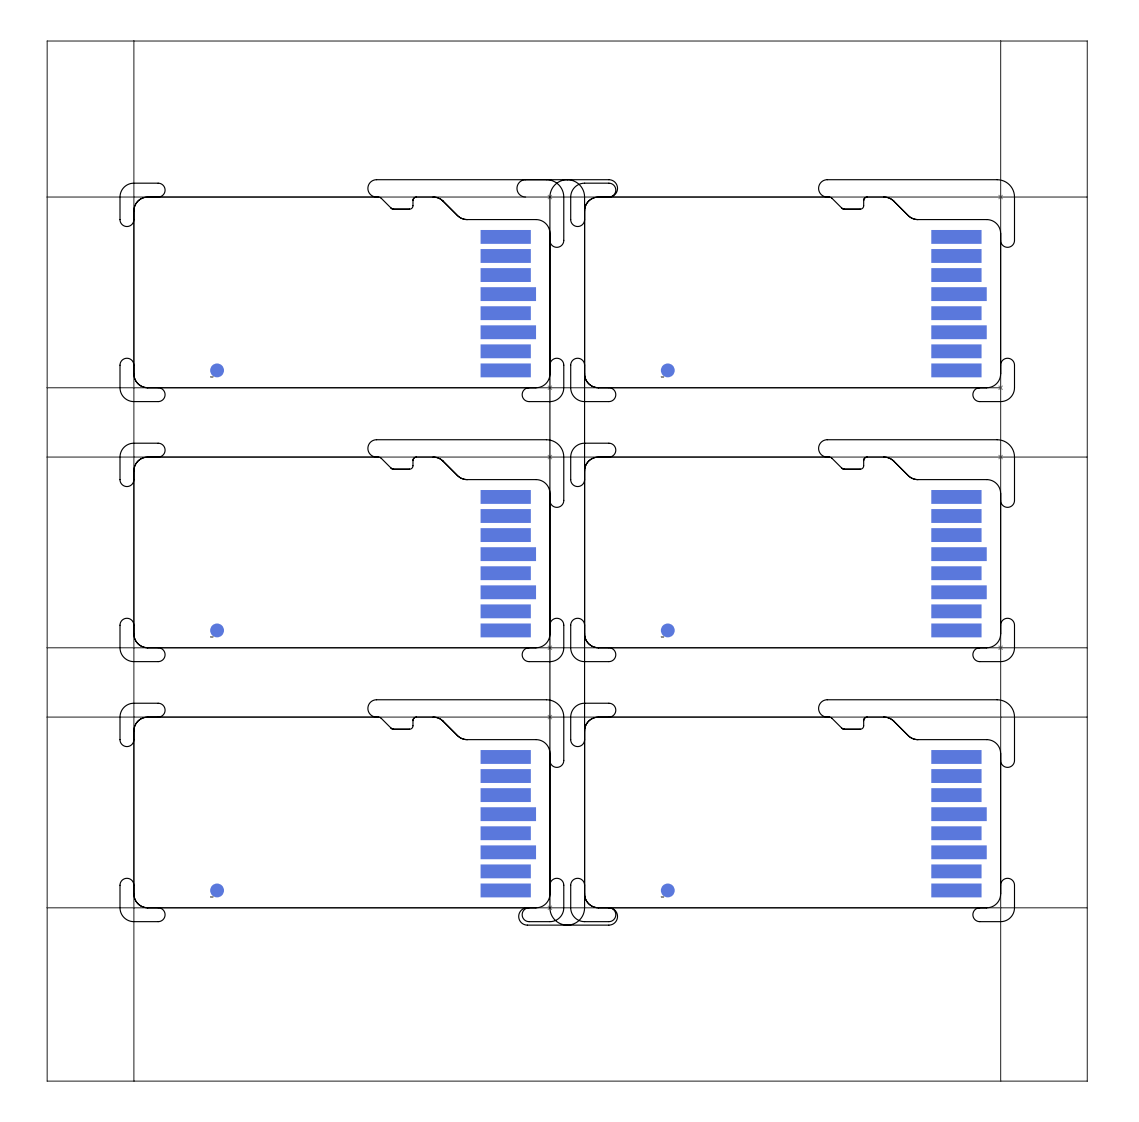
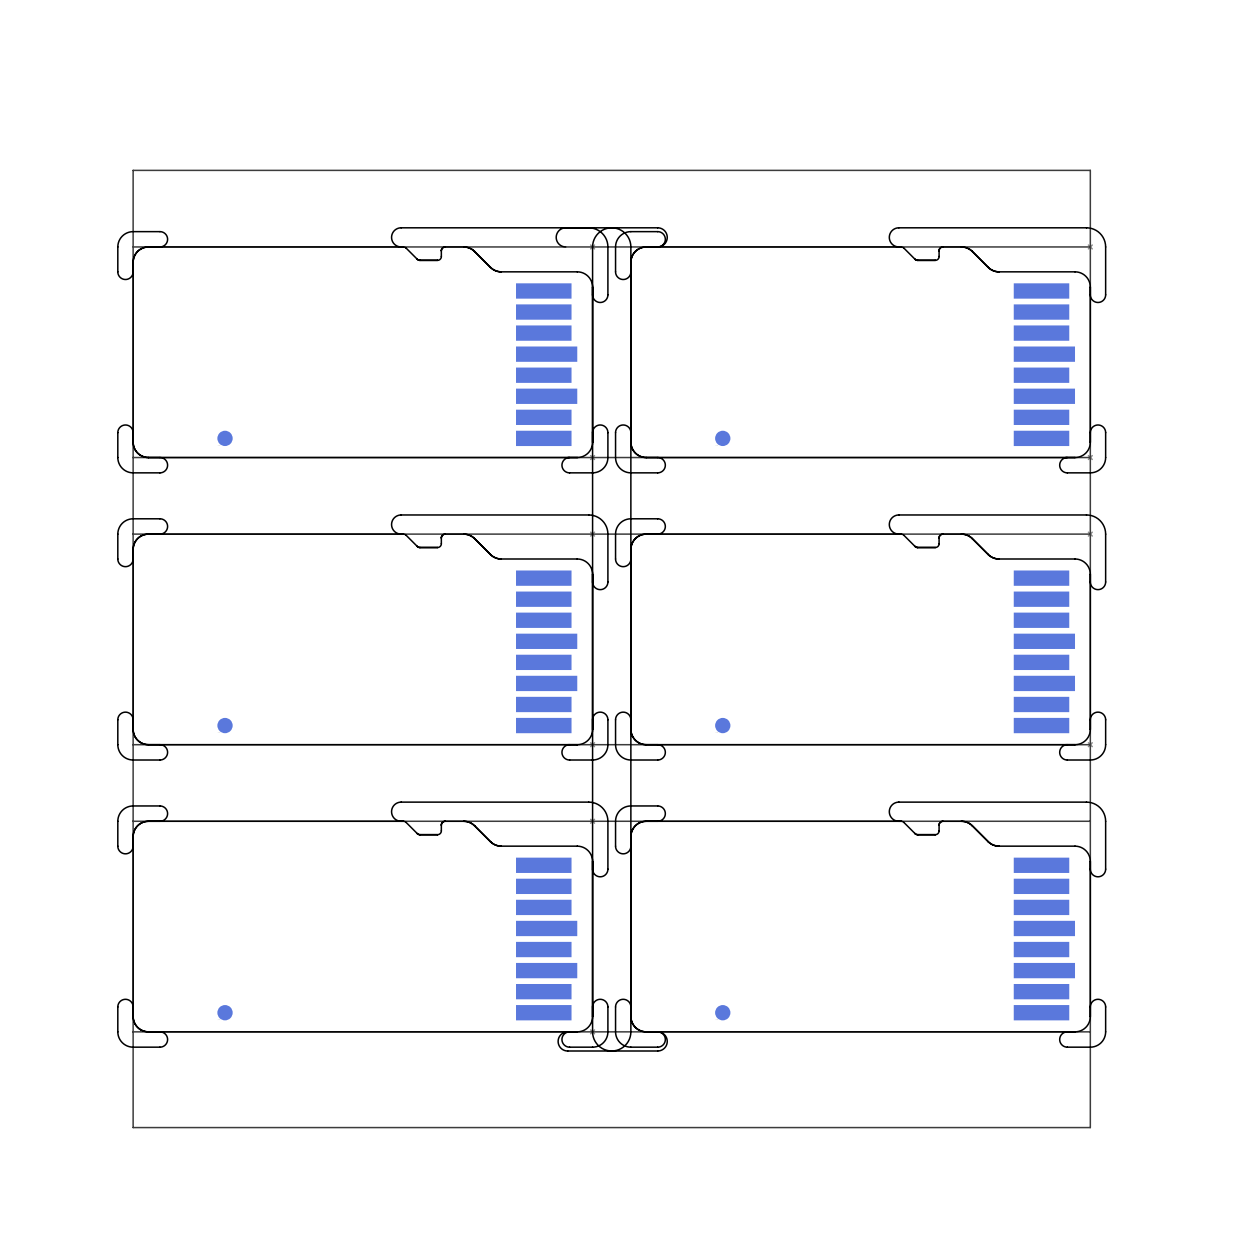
line: (133, 41) (133, 127) -> none
line: (1000, 41) (1000, 127) -> (133, 170) (1090, 170)
line: (1087, 41) (47, 41) (47, 1081) (1087, 1081) (1087, 41) -> none
line: (133, 197) (47, 197) -> none
line: (1087, 197) (1000, 197) -> none
line: (133, 387) (47, 387) -> none
line: (133, 457) (47, 457) -> none
line: (1087, 457) (1000, 457) -> none
line: (133, 647) (47, 647) -> none
line: (1087, 647) (1000, 647) -> none
line: (133, 717) (47, 717) -> none
line: (1087, 717) (1000, 717) -> none
line: (133, 907) (47, 907) -> none
line: (1087, 907) (1000, 907) -> none
line: (133, 994) (133, 1081) -> none
line: (1000, 994) (1000, 1081) -> (1090, 1127) (133, 1127)

